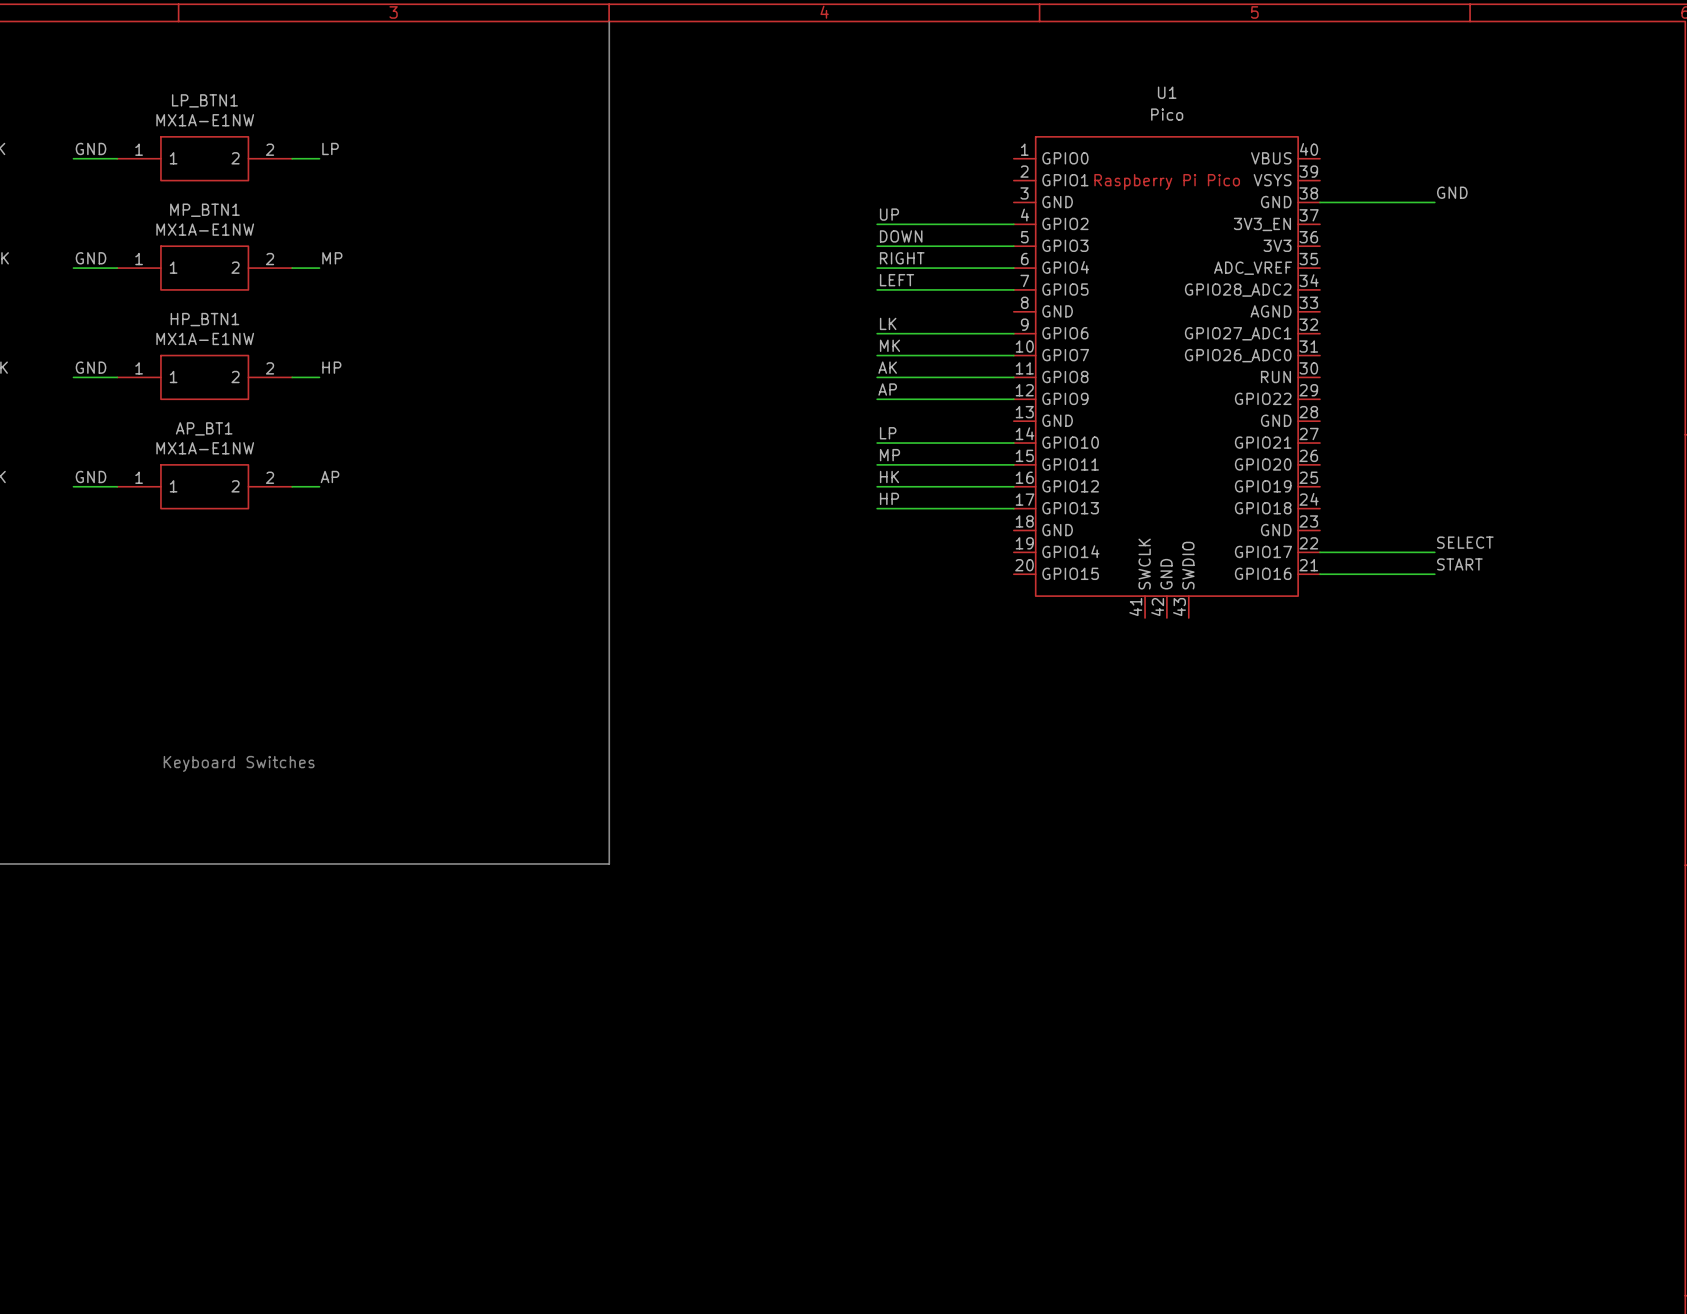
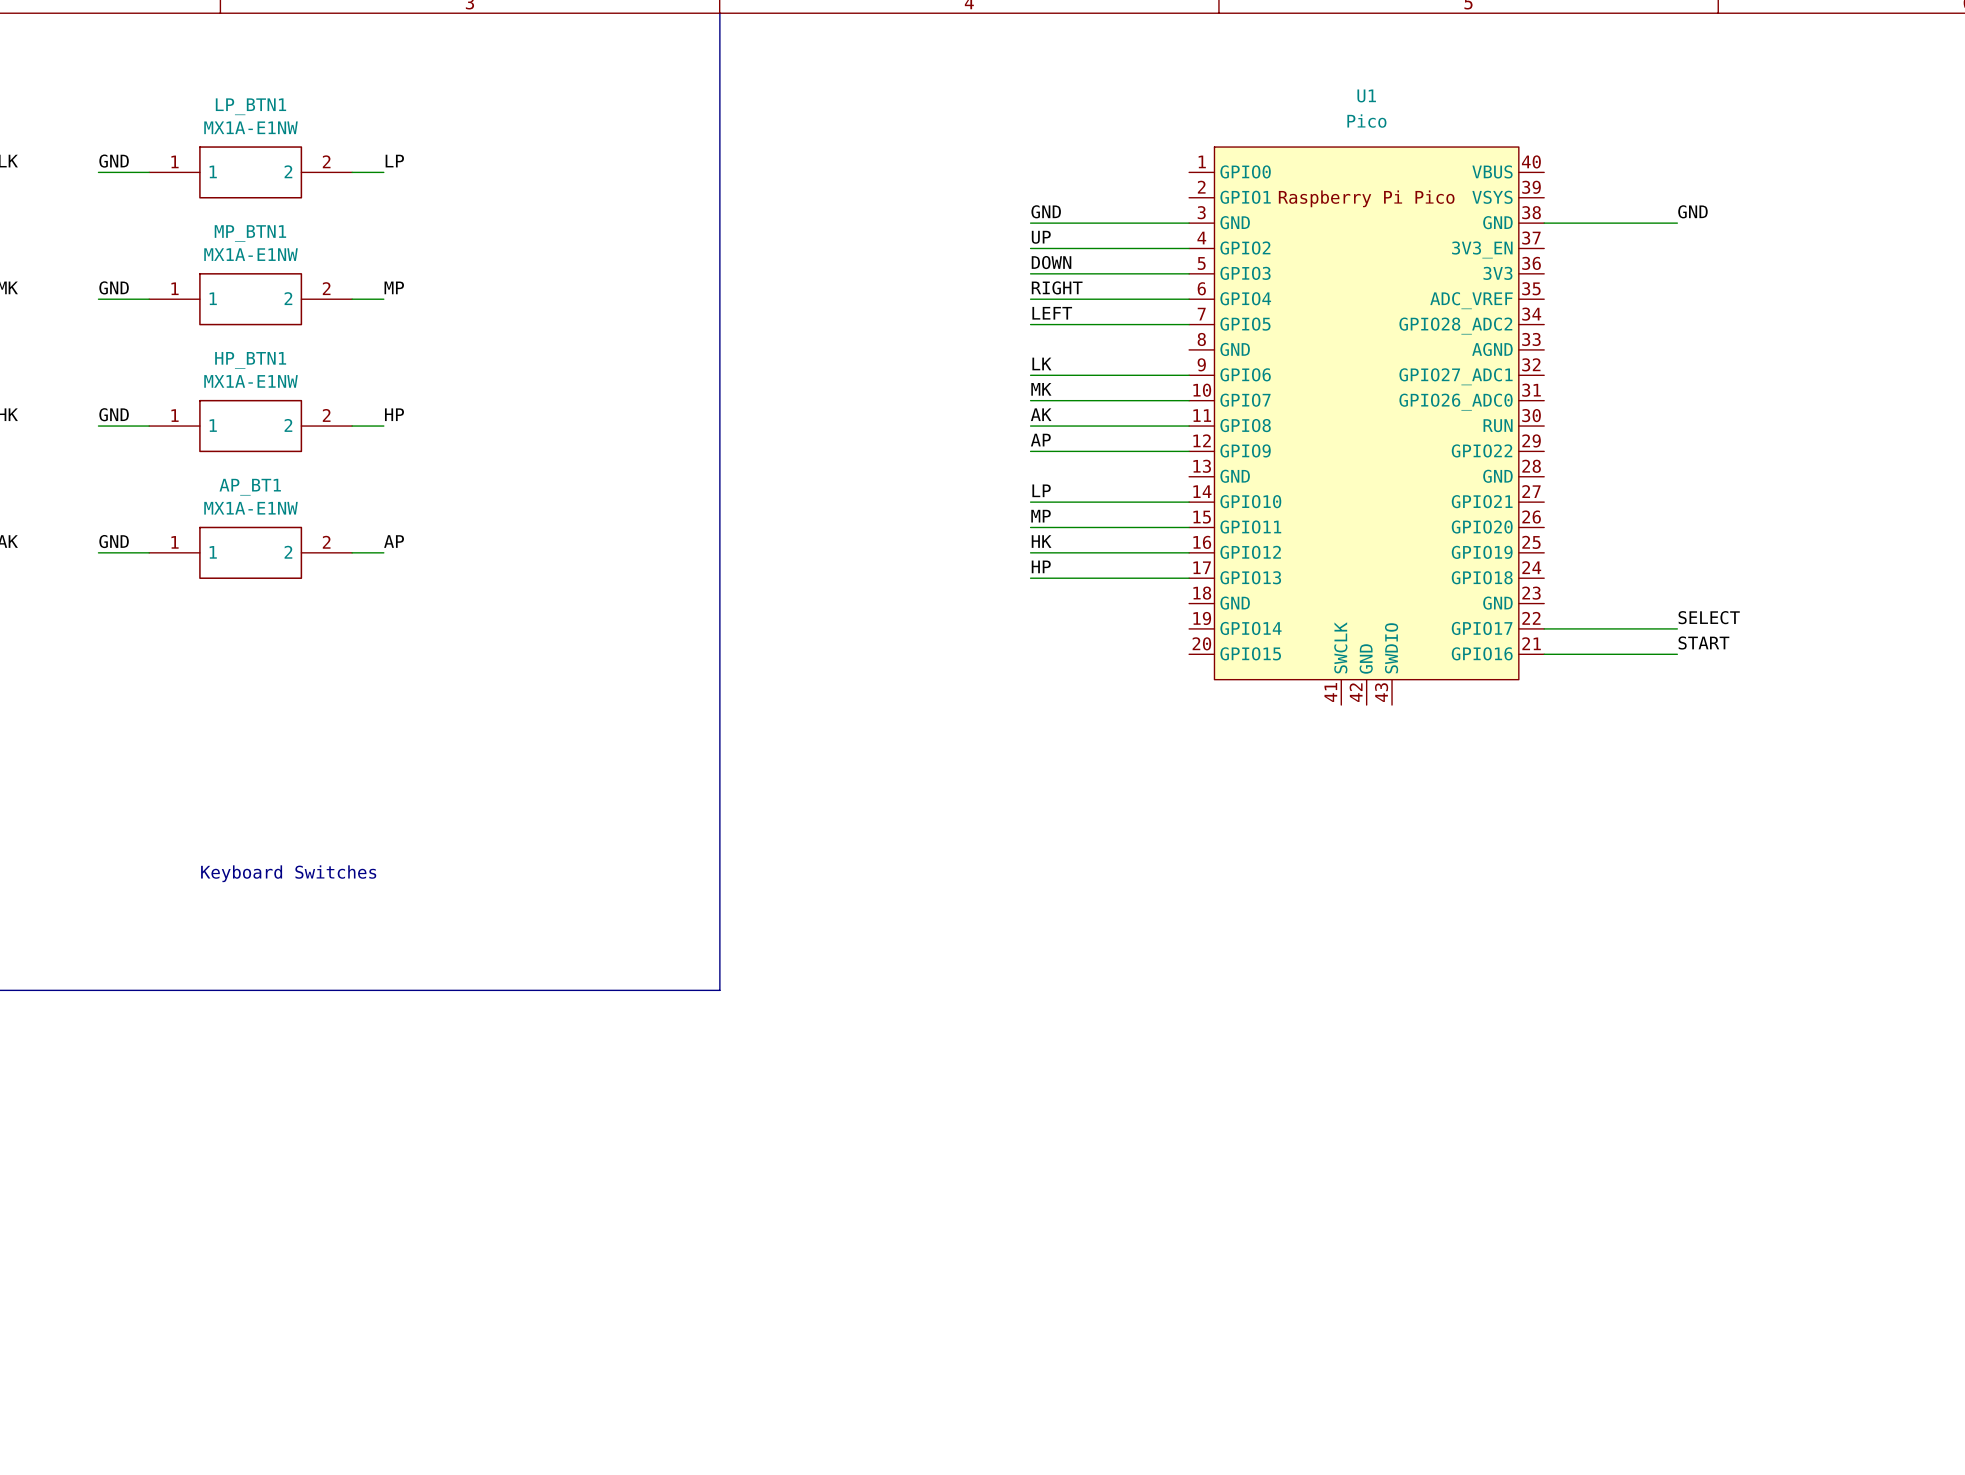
label: none -> GND (1046, 211)
wire: none -> (1030, 223) (1189, 223)

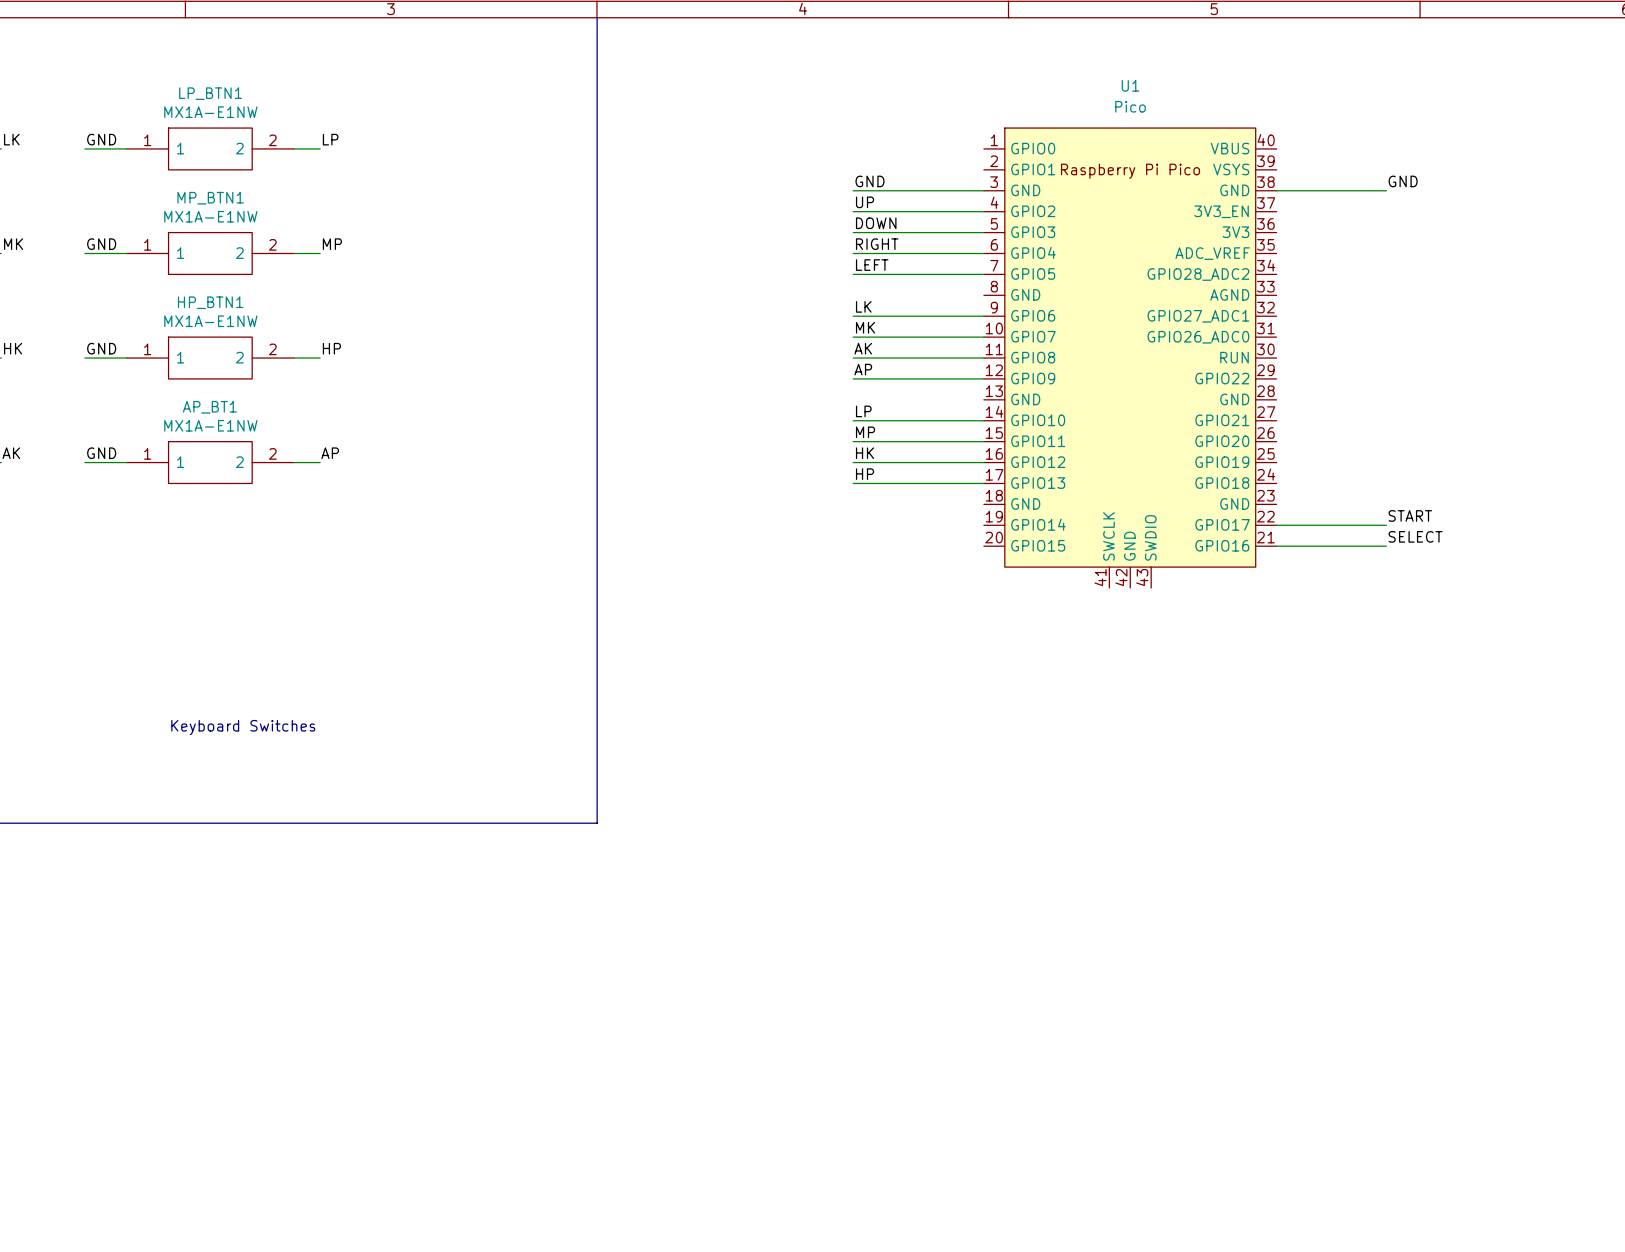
label: SELECT (1709, 617) -> START (1410, 515)
label: START (1703, 642) -> SELECT (1415, 536)

